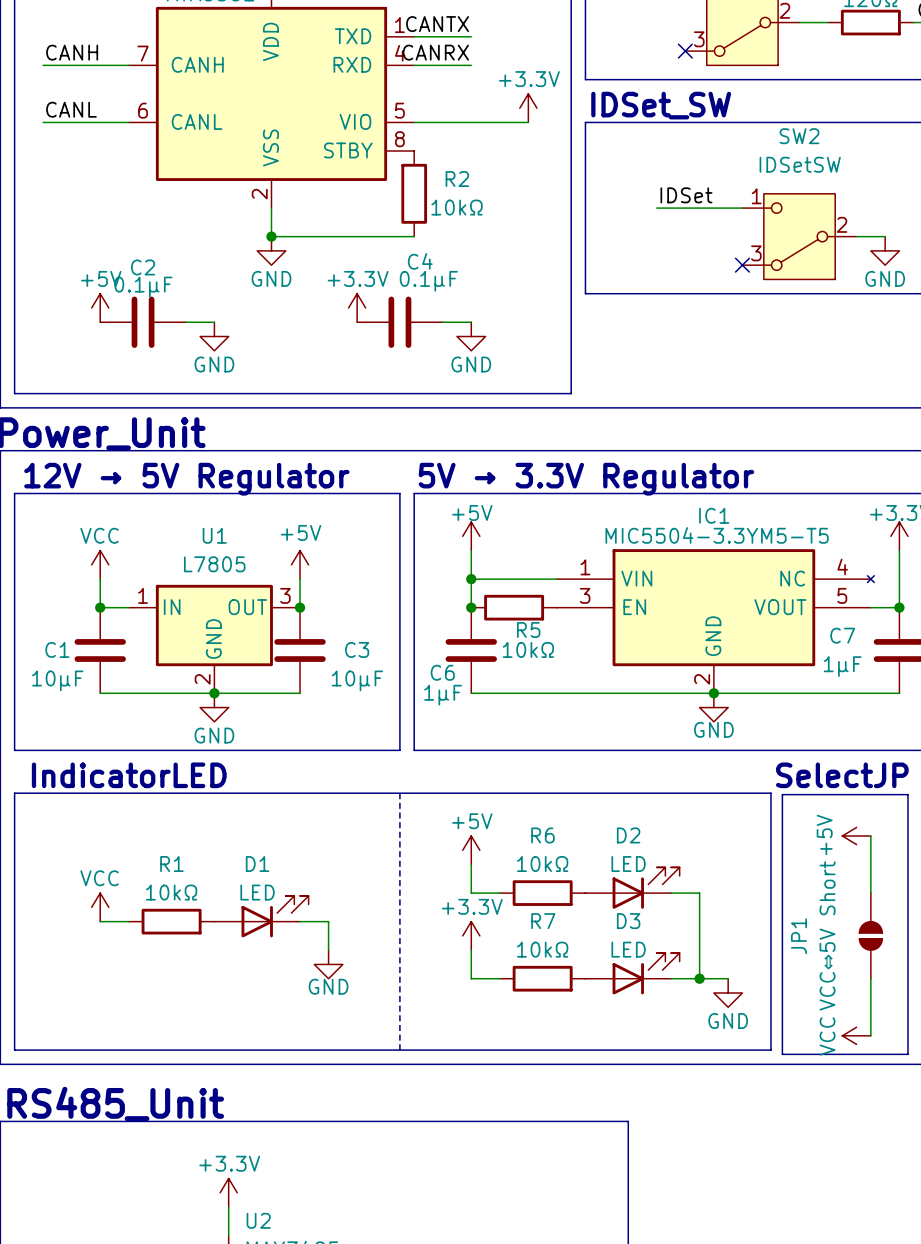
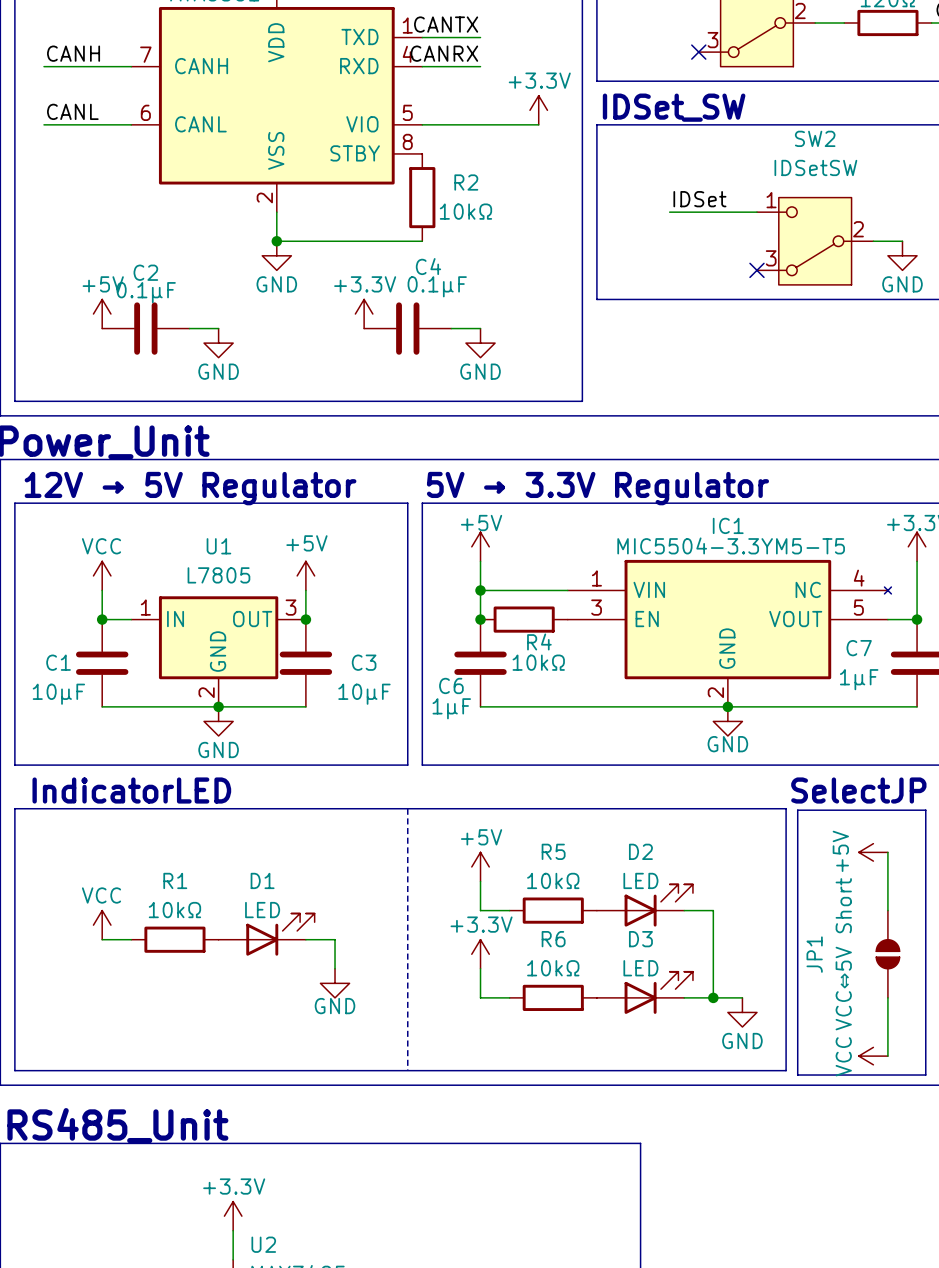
R5 name: R5 (528, 629) -> R4 (539, 641)
R6 name: R6 (542, 835) -> R5 (553, 851)
R7 name: R7 (543, 921) -> R6 (553, 939)

